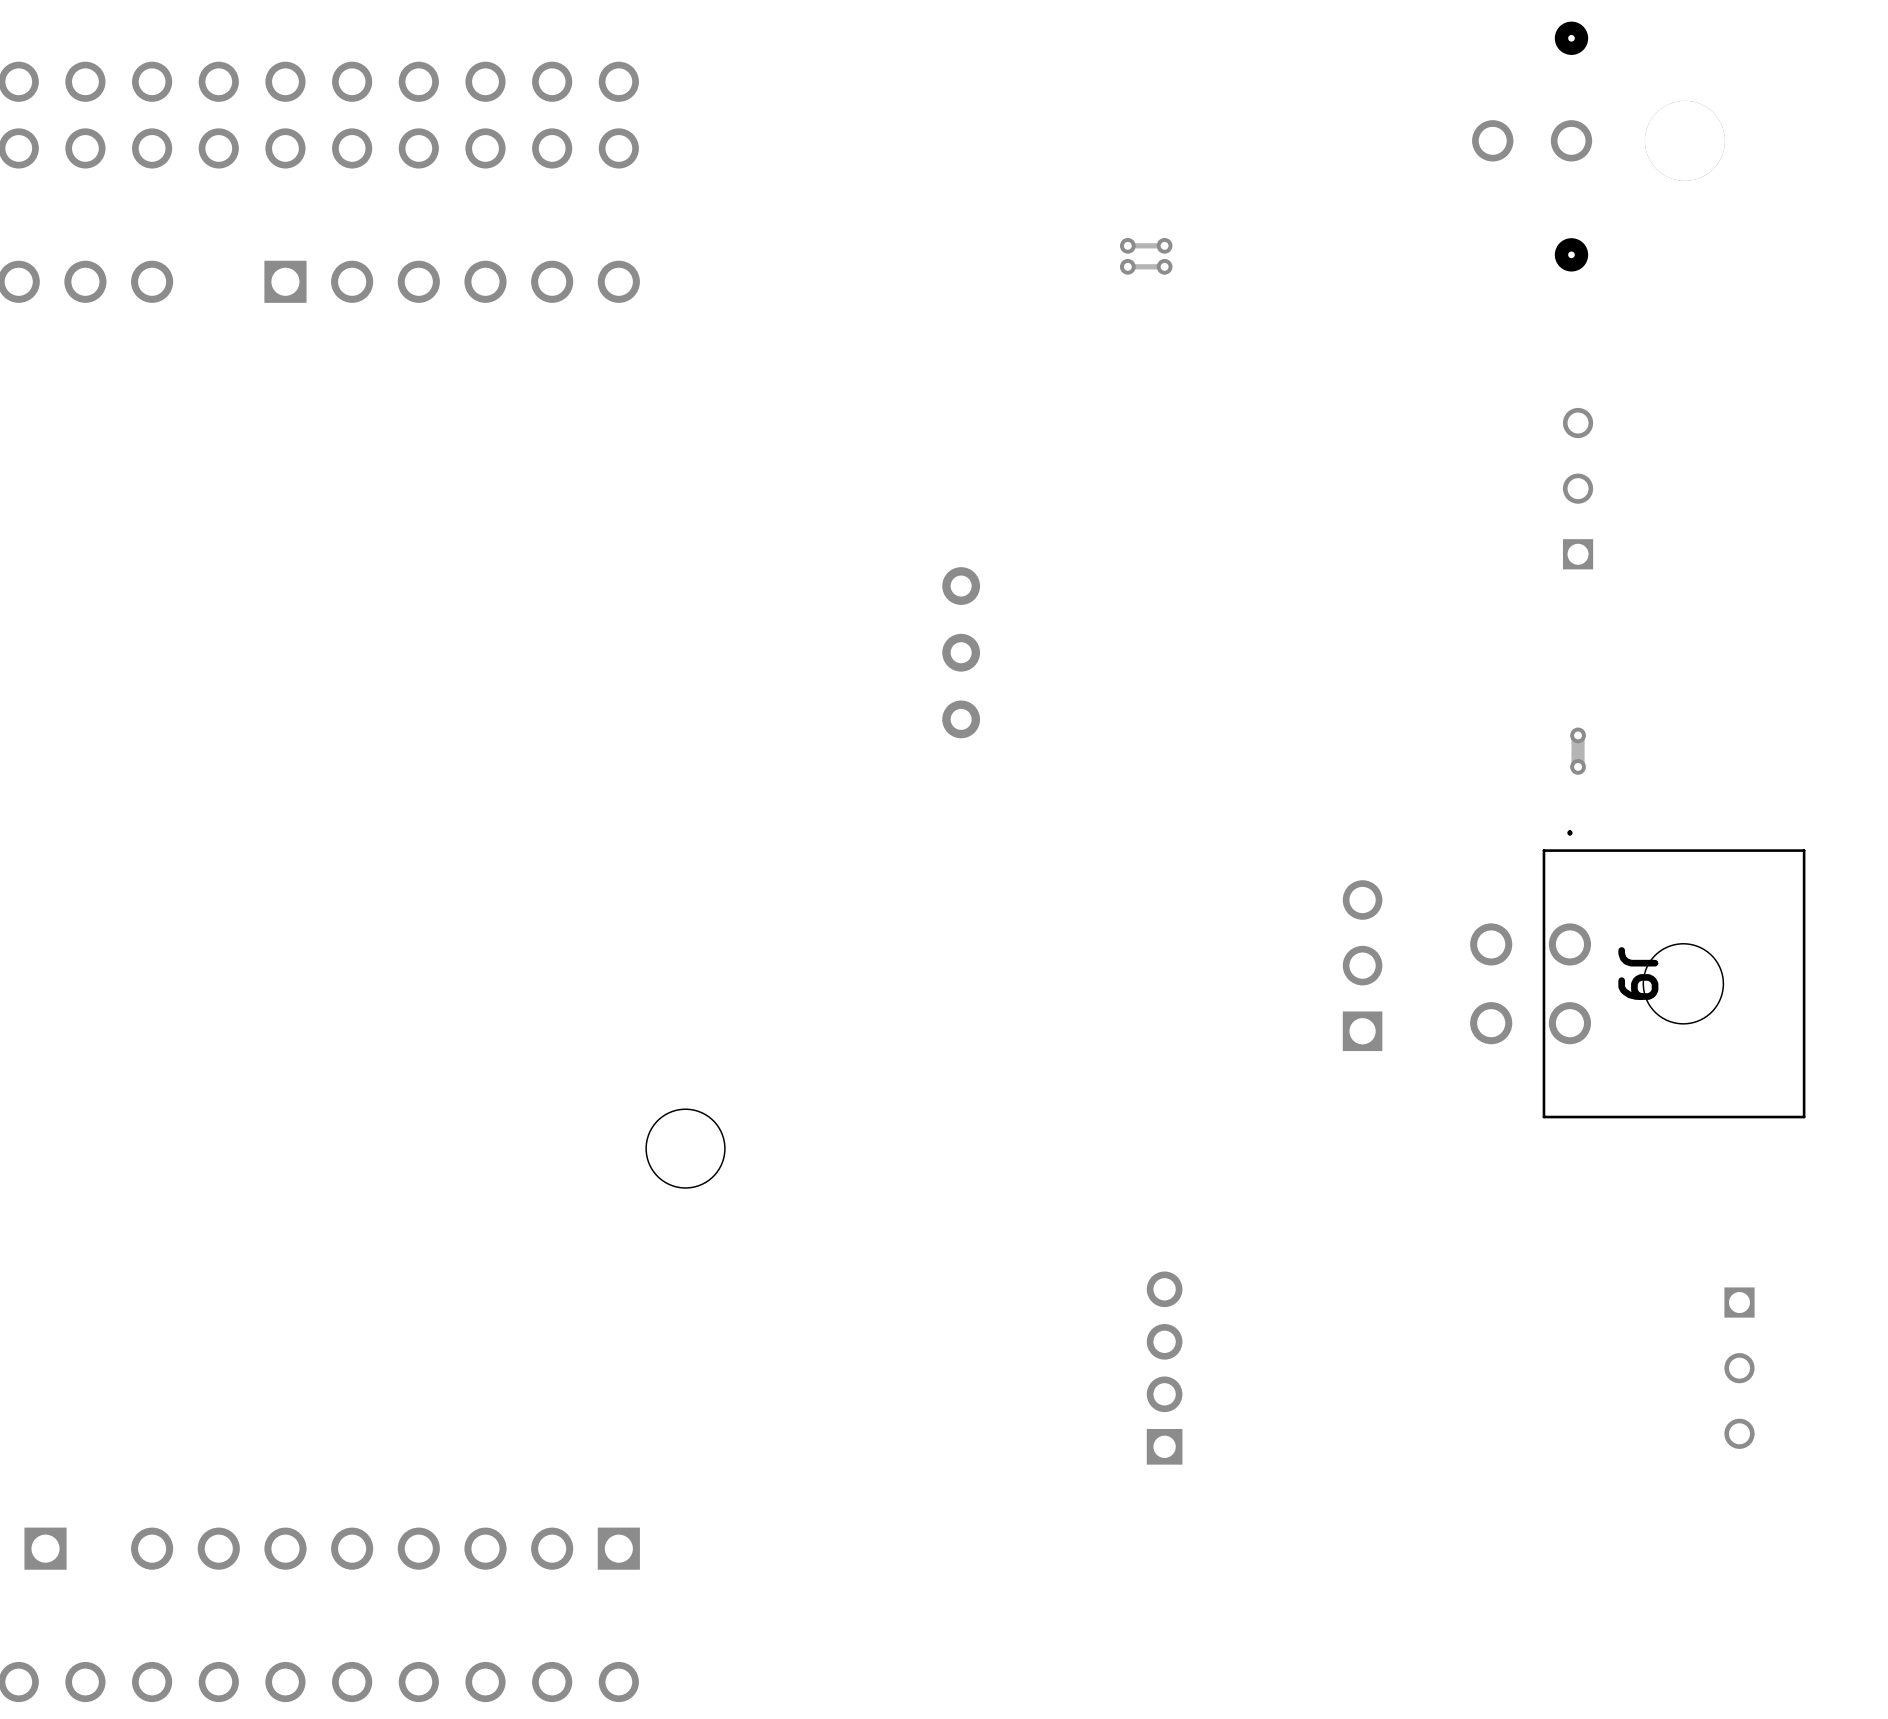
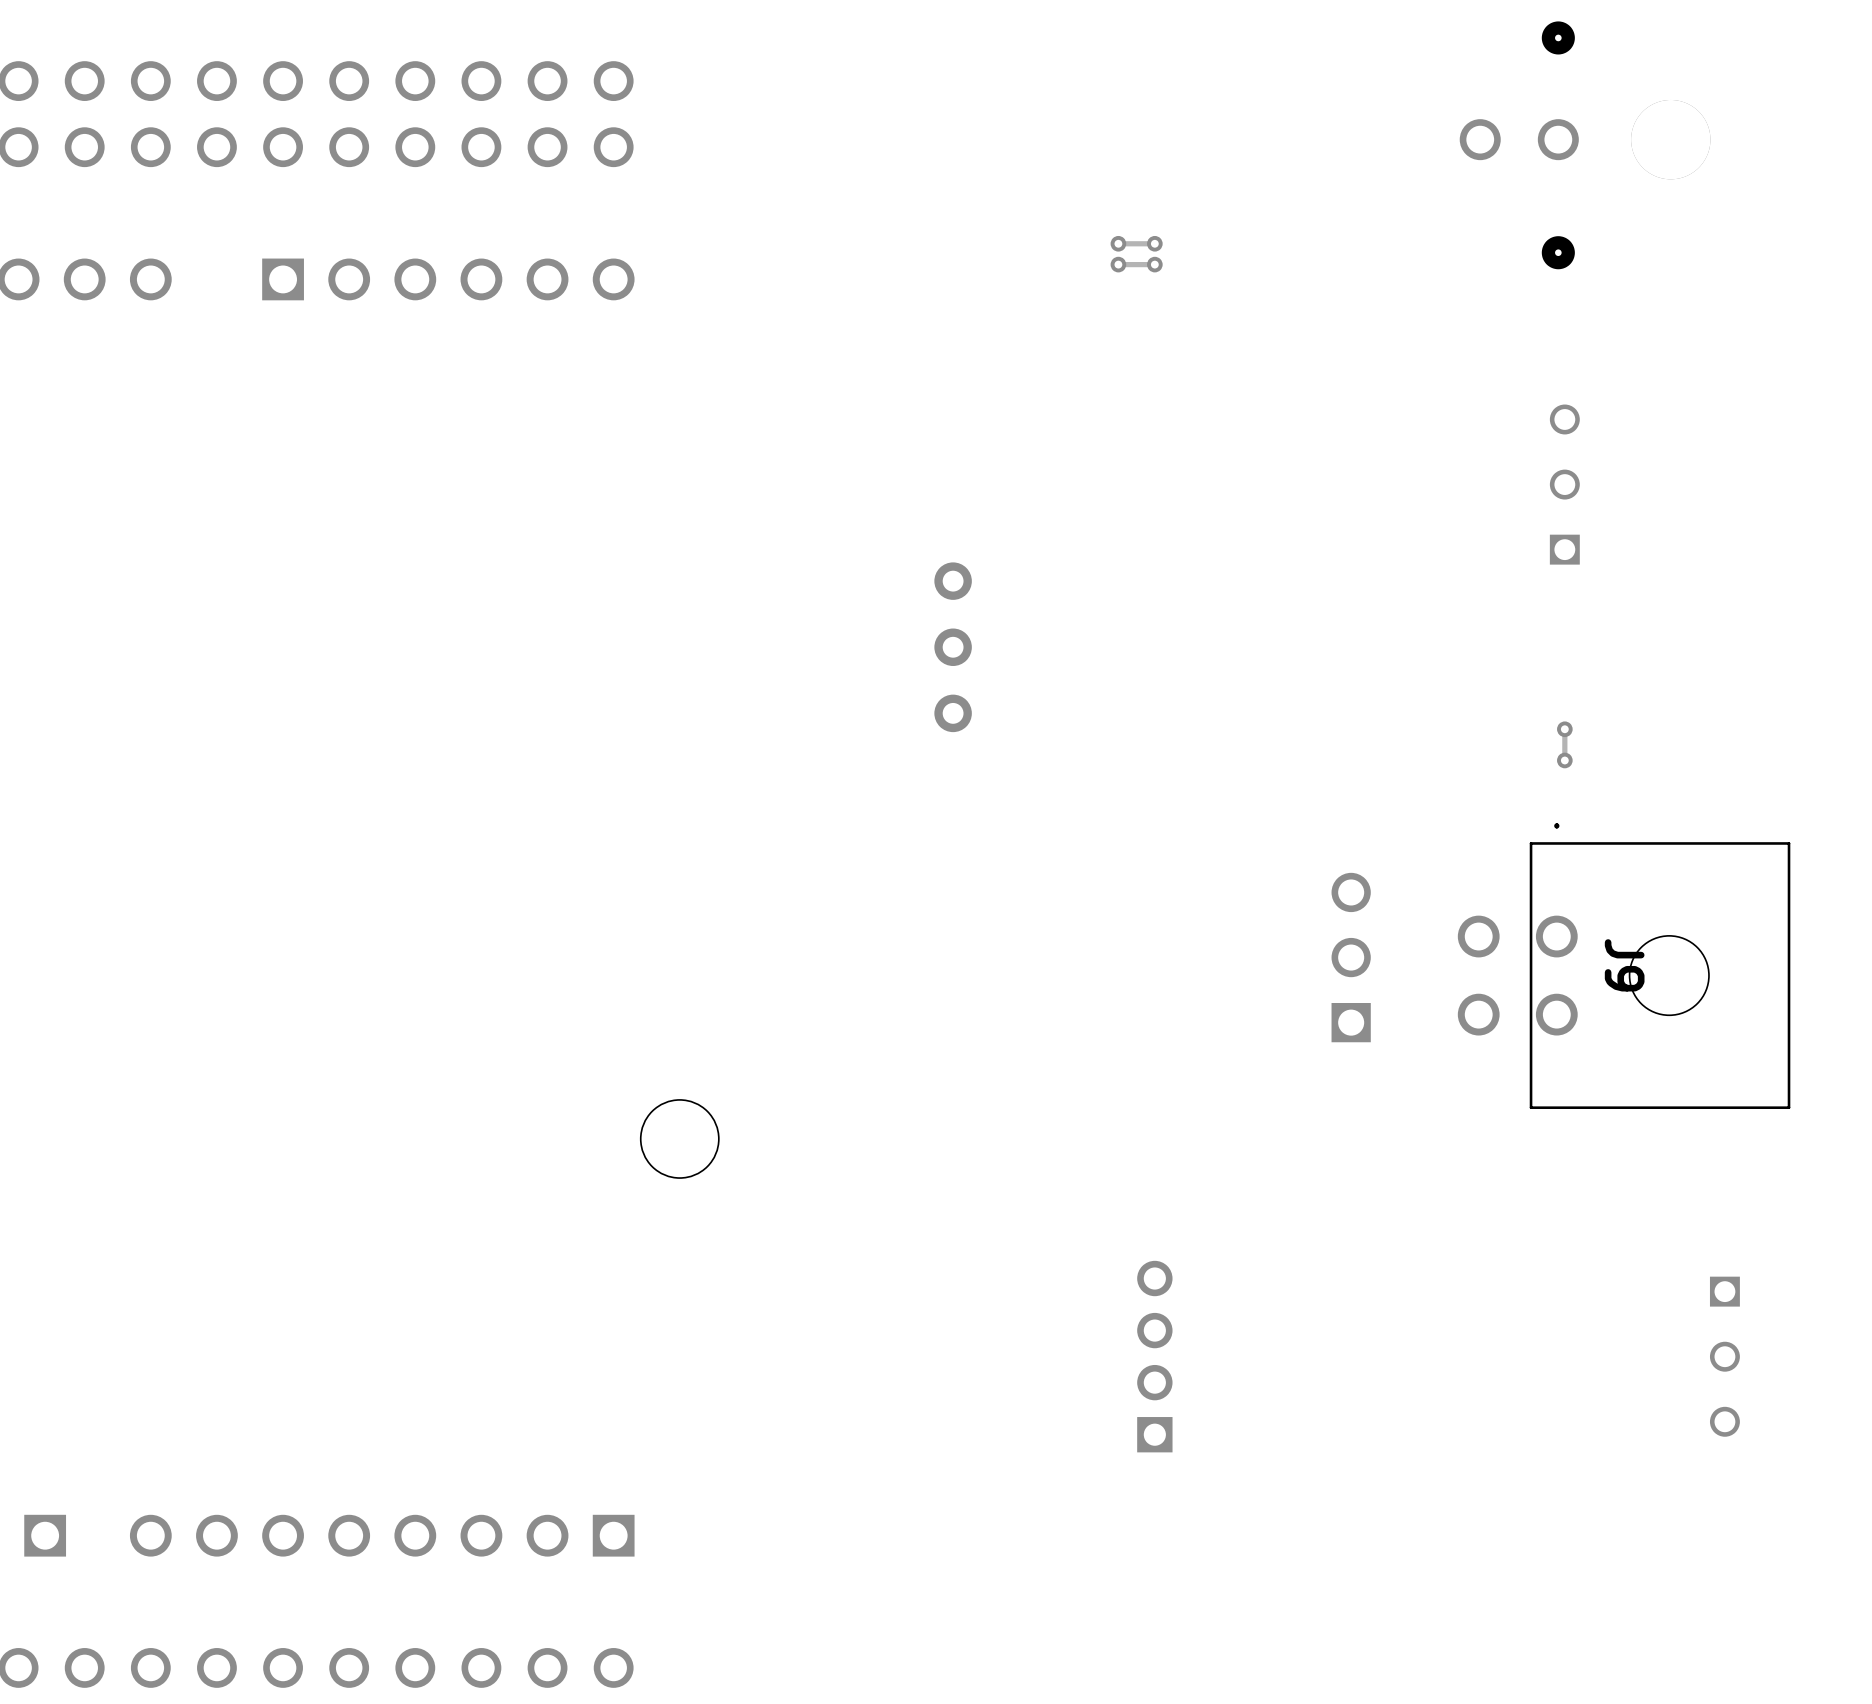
track width: thick (1578, 735) (1578, 766) -> thin (1564, 729) (1564, 760)

